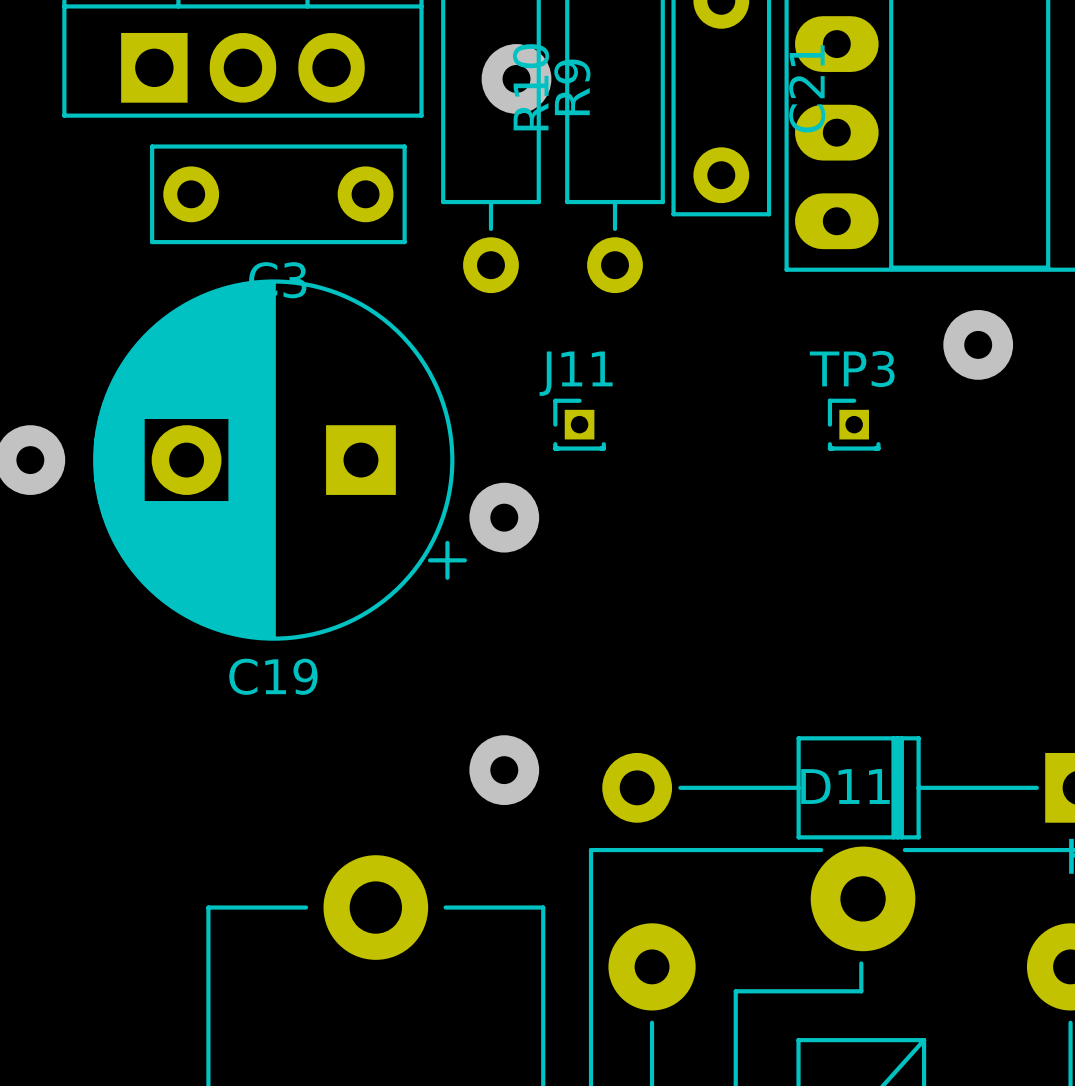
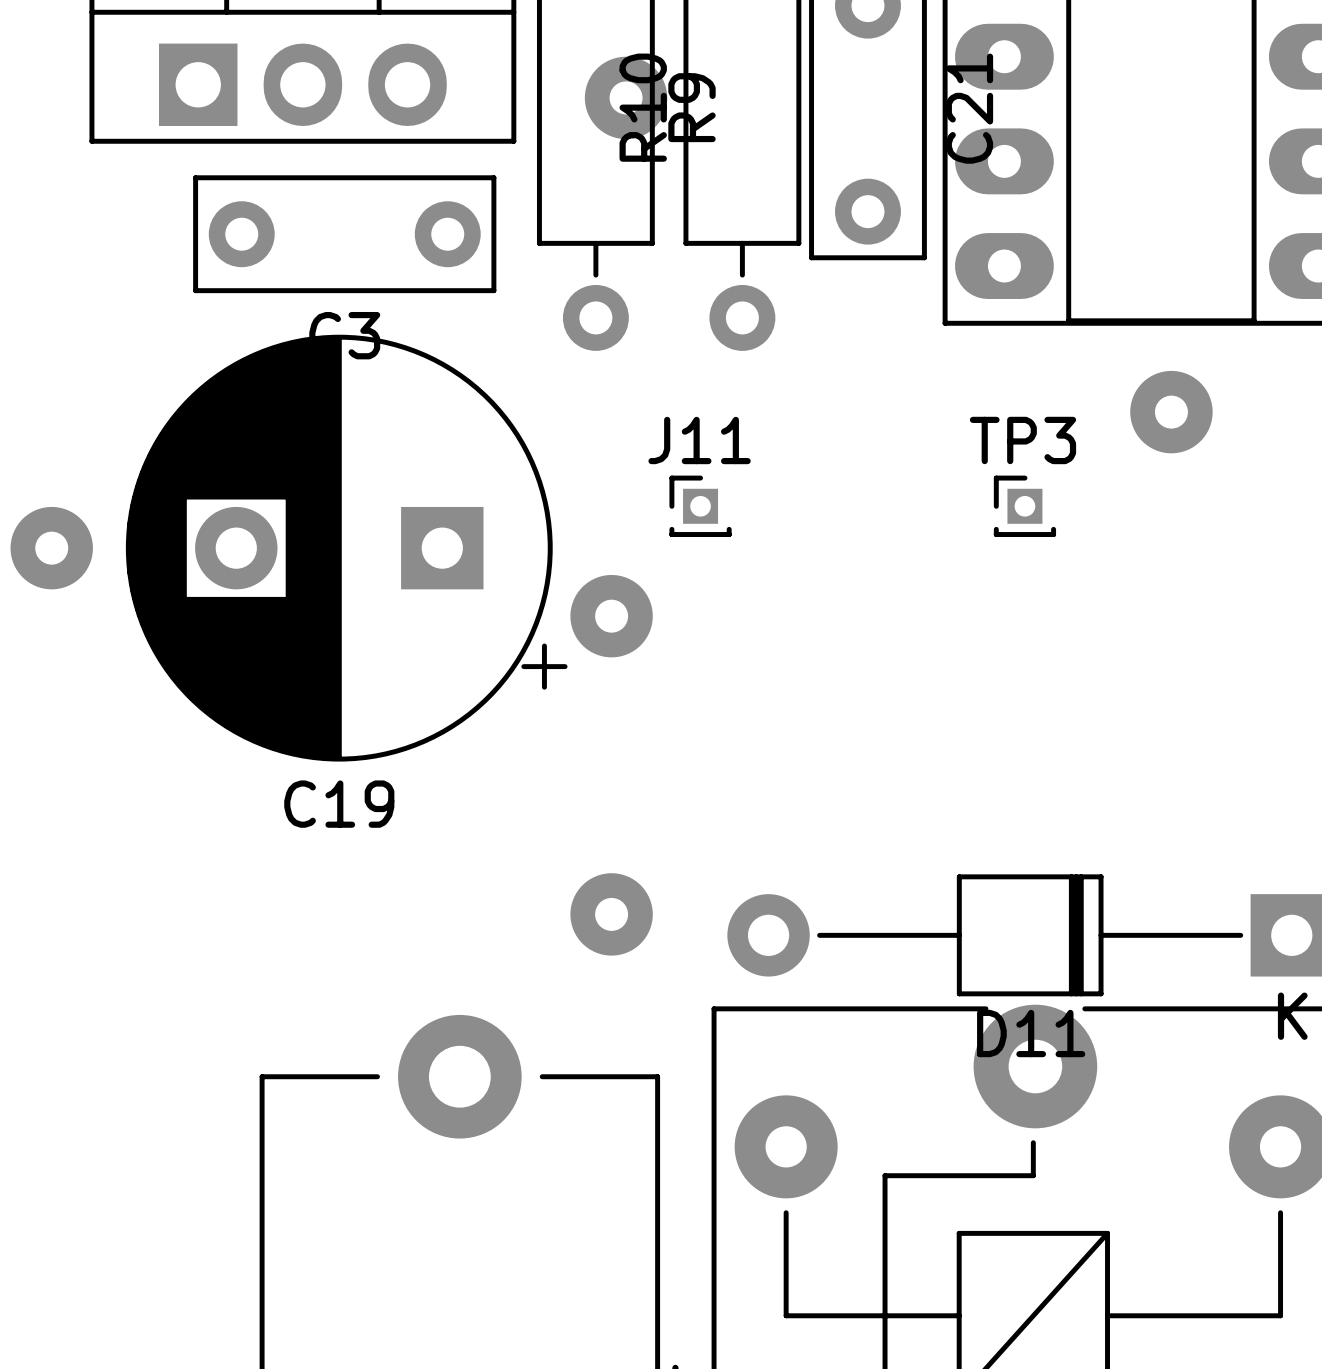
D11 name position: D11 (845, 786) -> D11 (1031, 1033)

